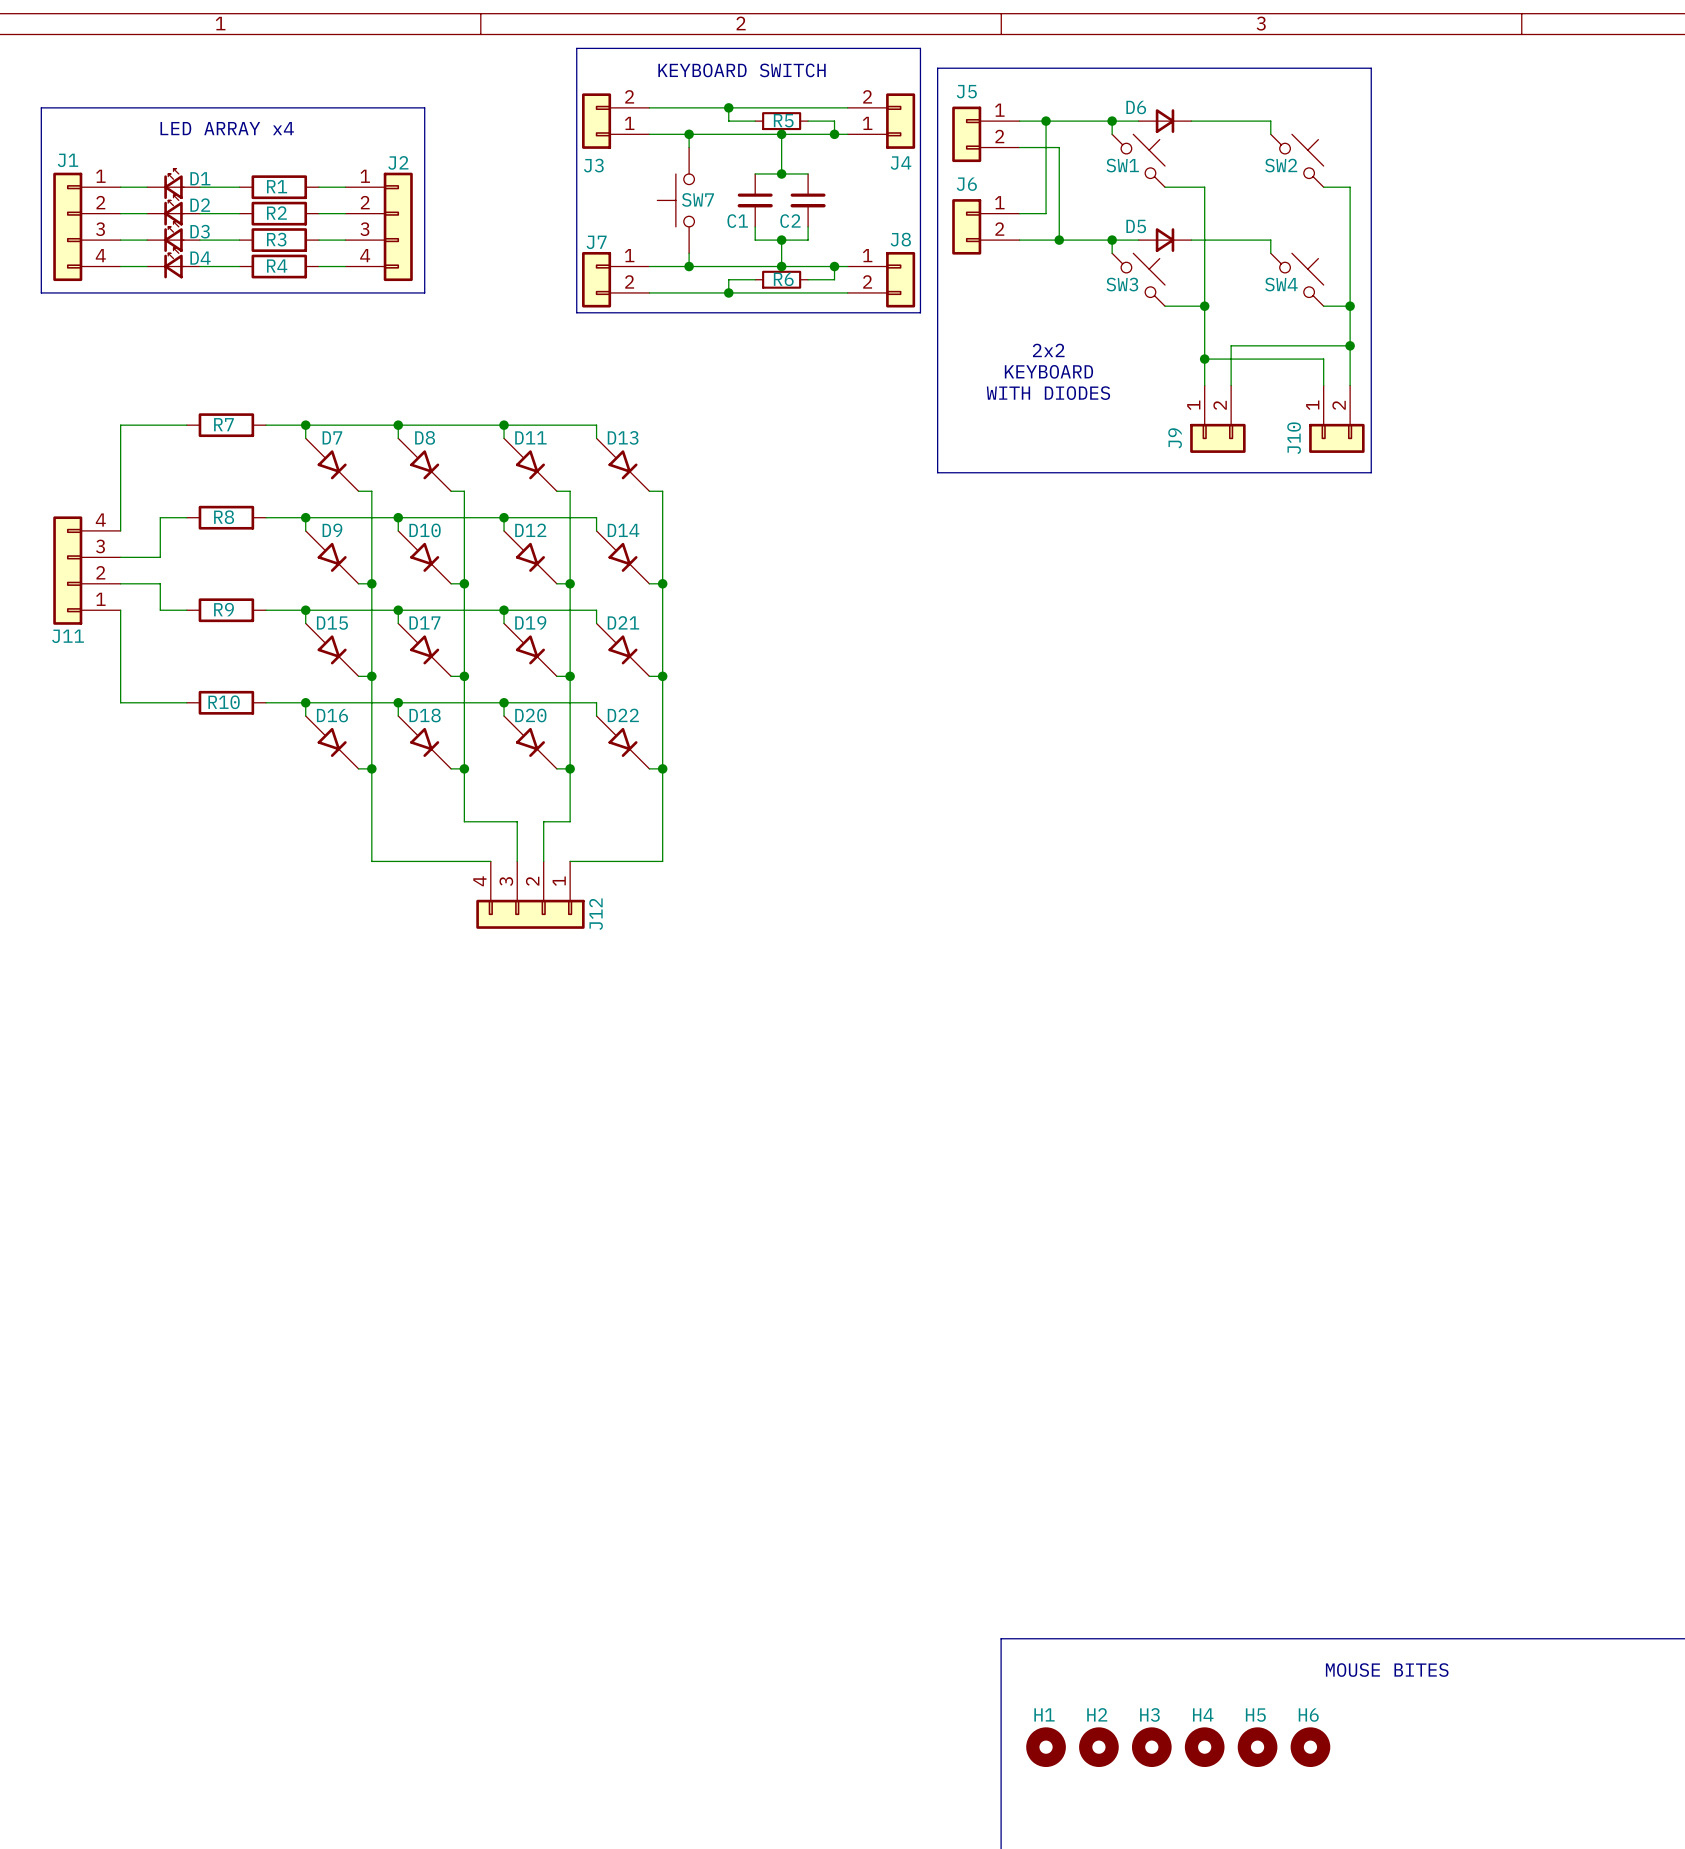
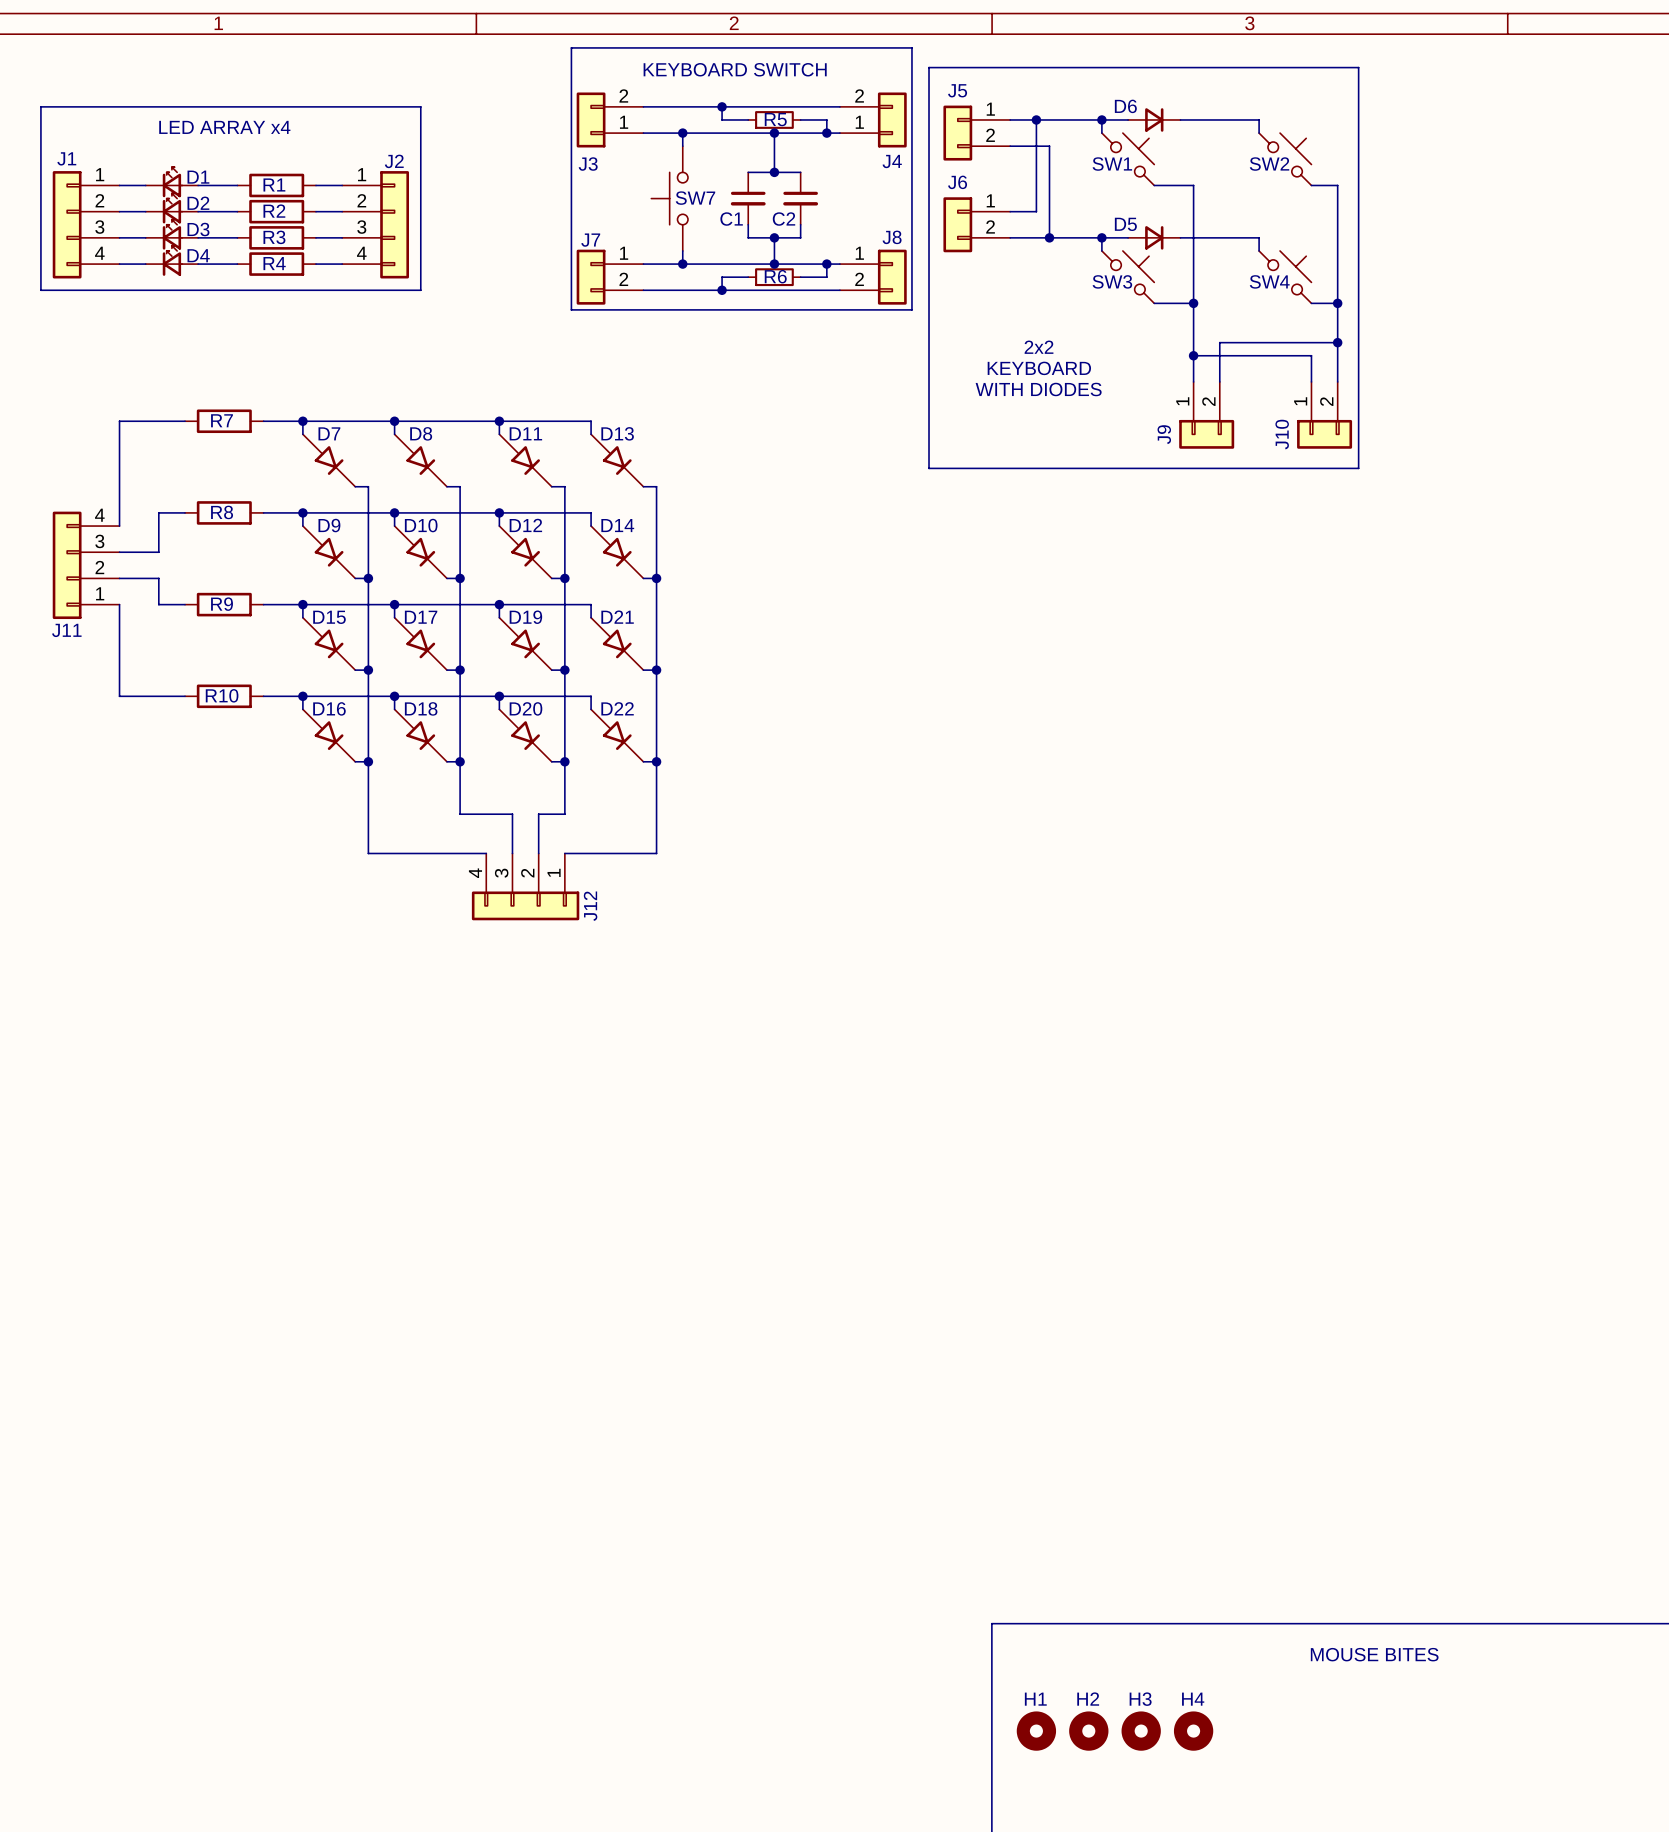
H5: (1257, 1747) -> none
H6: (1310, 1747) -> none

